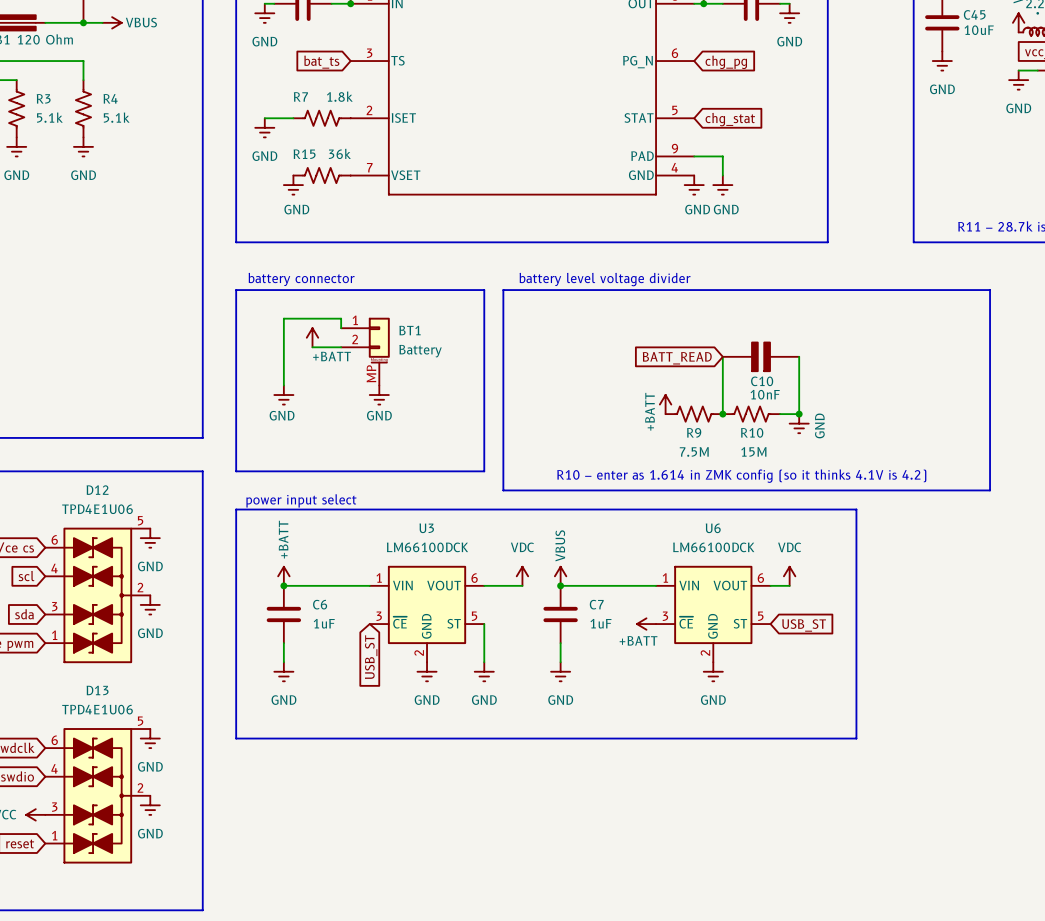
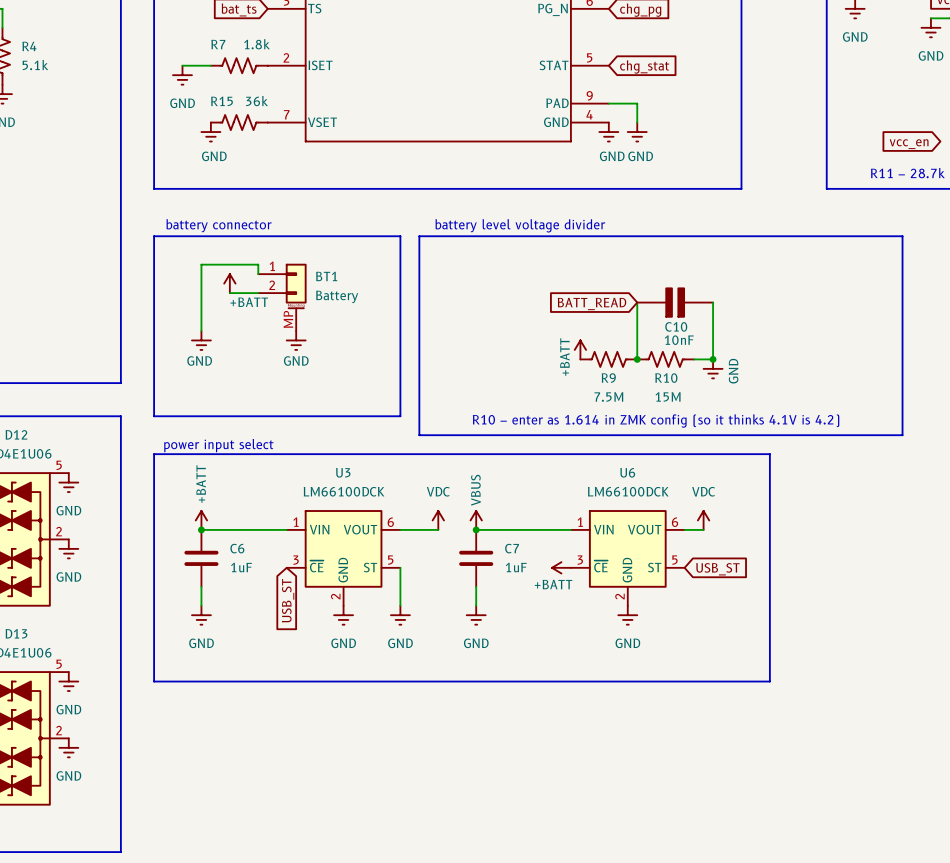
global label: none -> vcc_en (909, 144)

